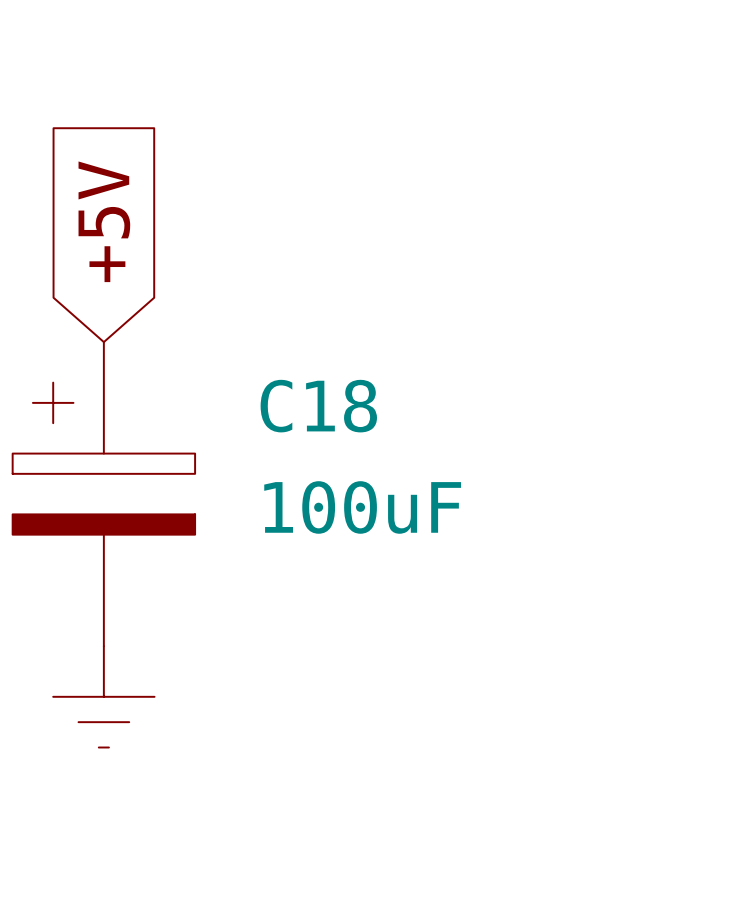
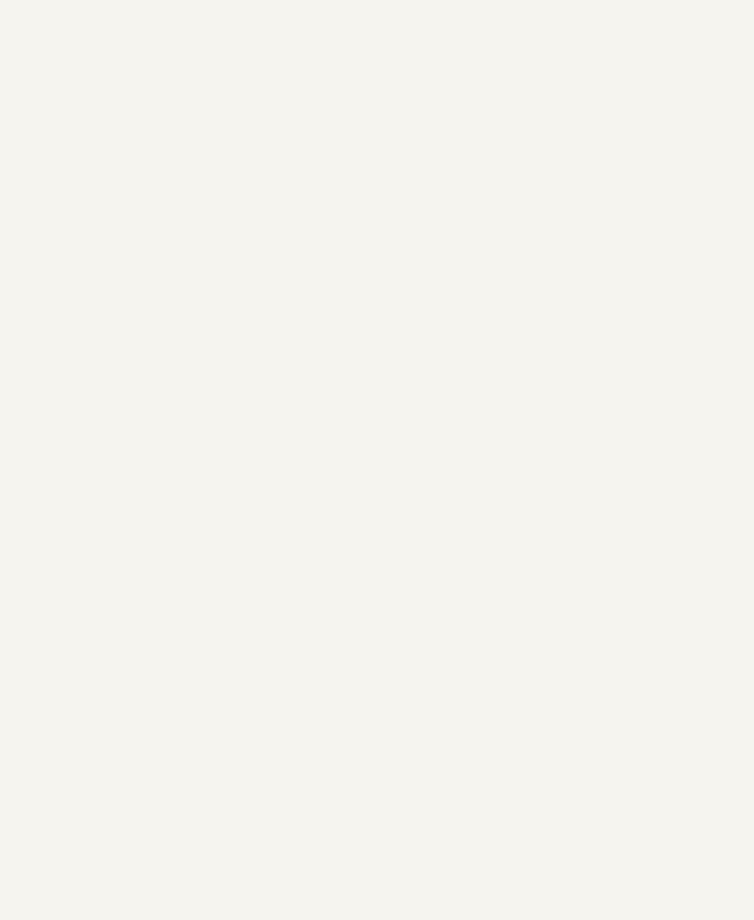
global label: +5V (104, 221) -> none
C18: 100uF (103, 494) -> none
power symbol: (103, 696) -> none

